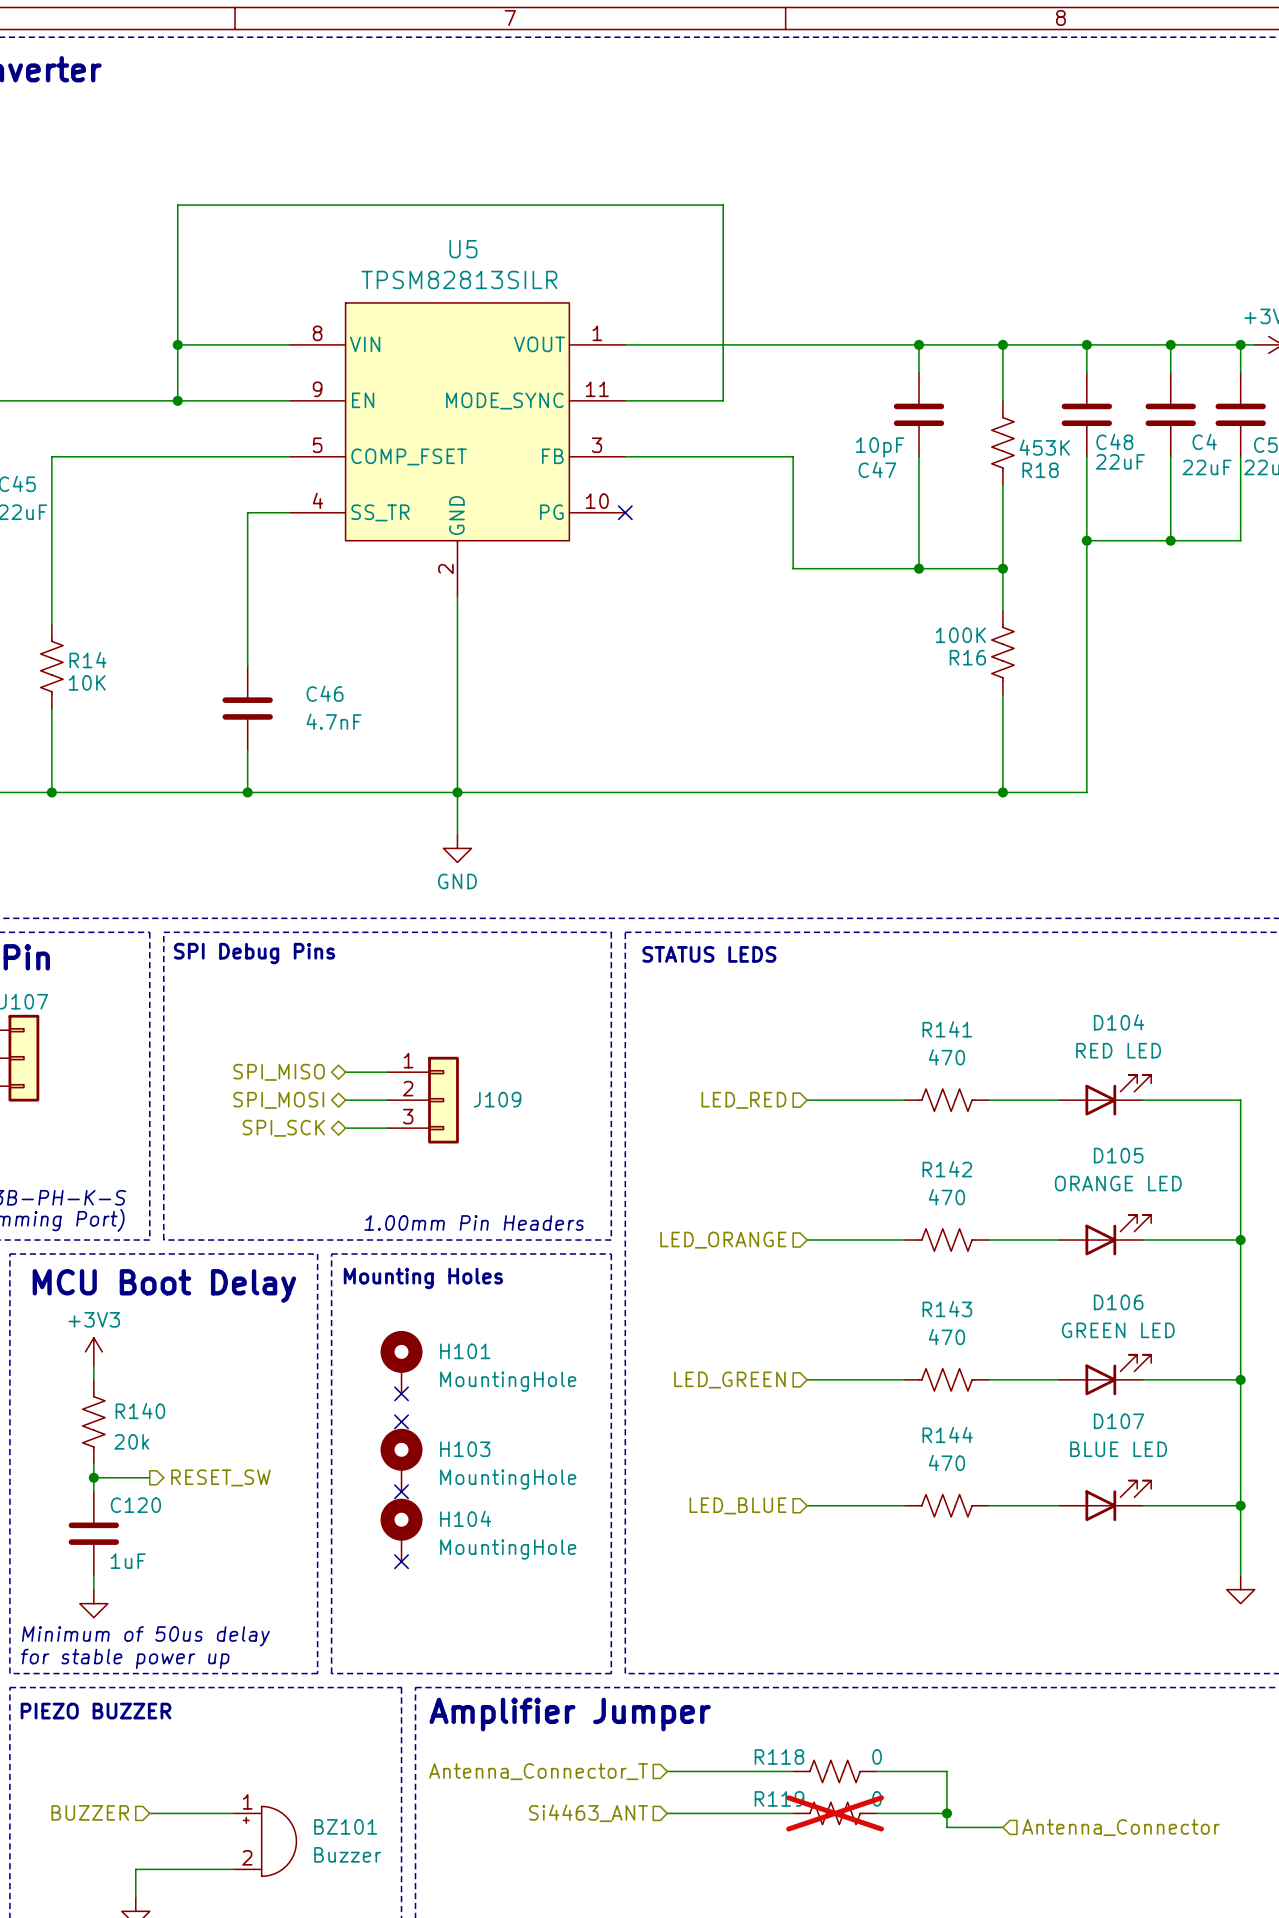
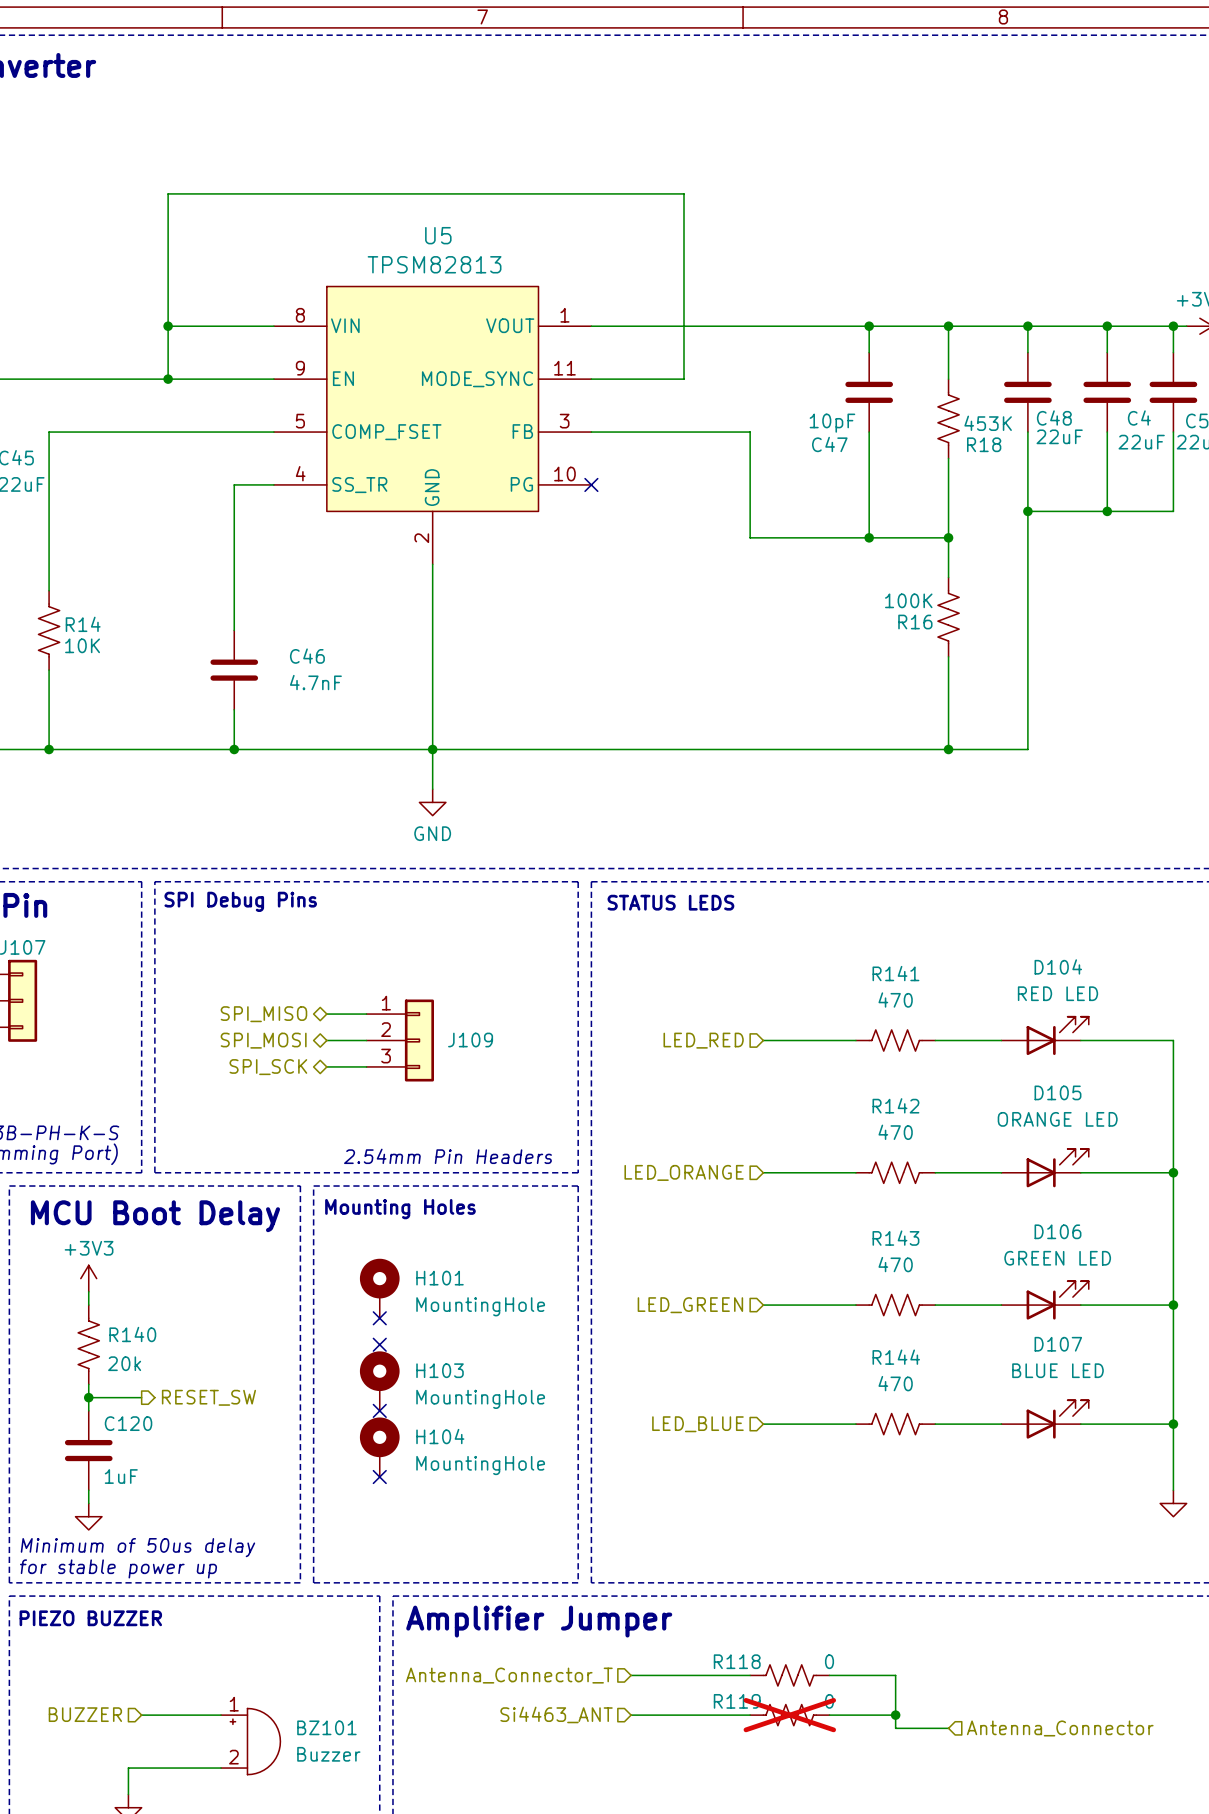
U5 value: TPSM82813SILR (459, 279) -> TPSM82813 (434, 264)
text: 1.00mm Pin Headers (474, 1222) -> 2.54mm Pin Headers (448, 1156)

